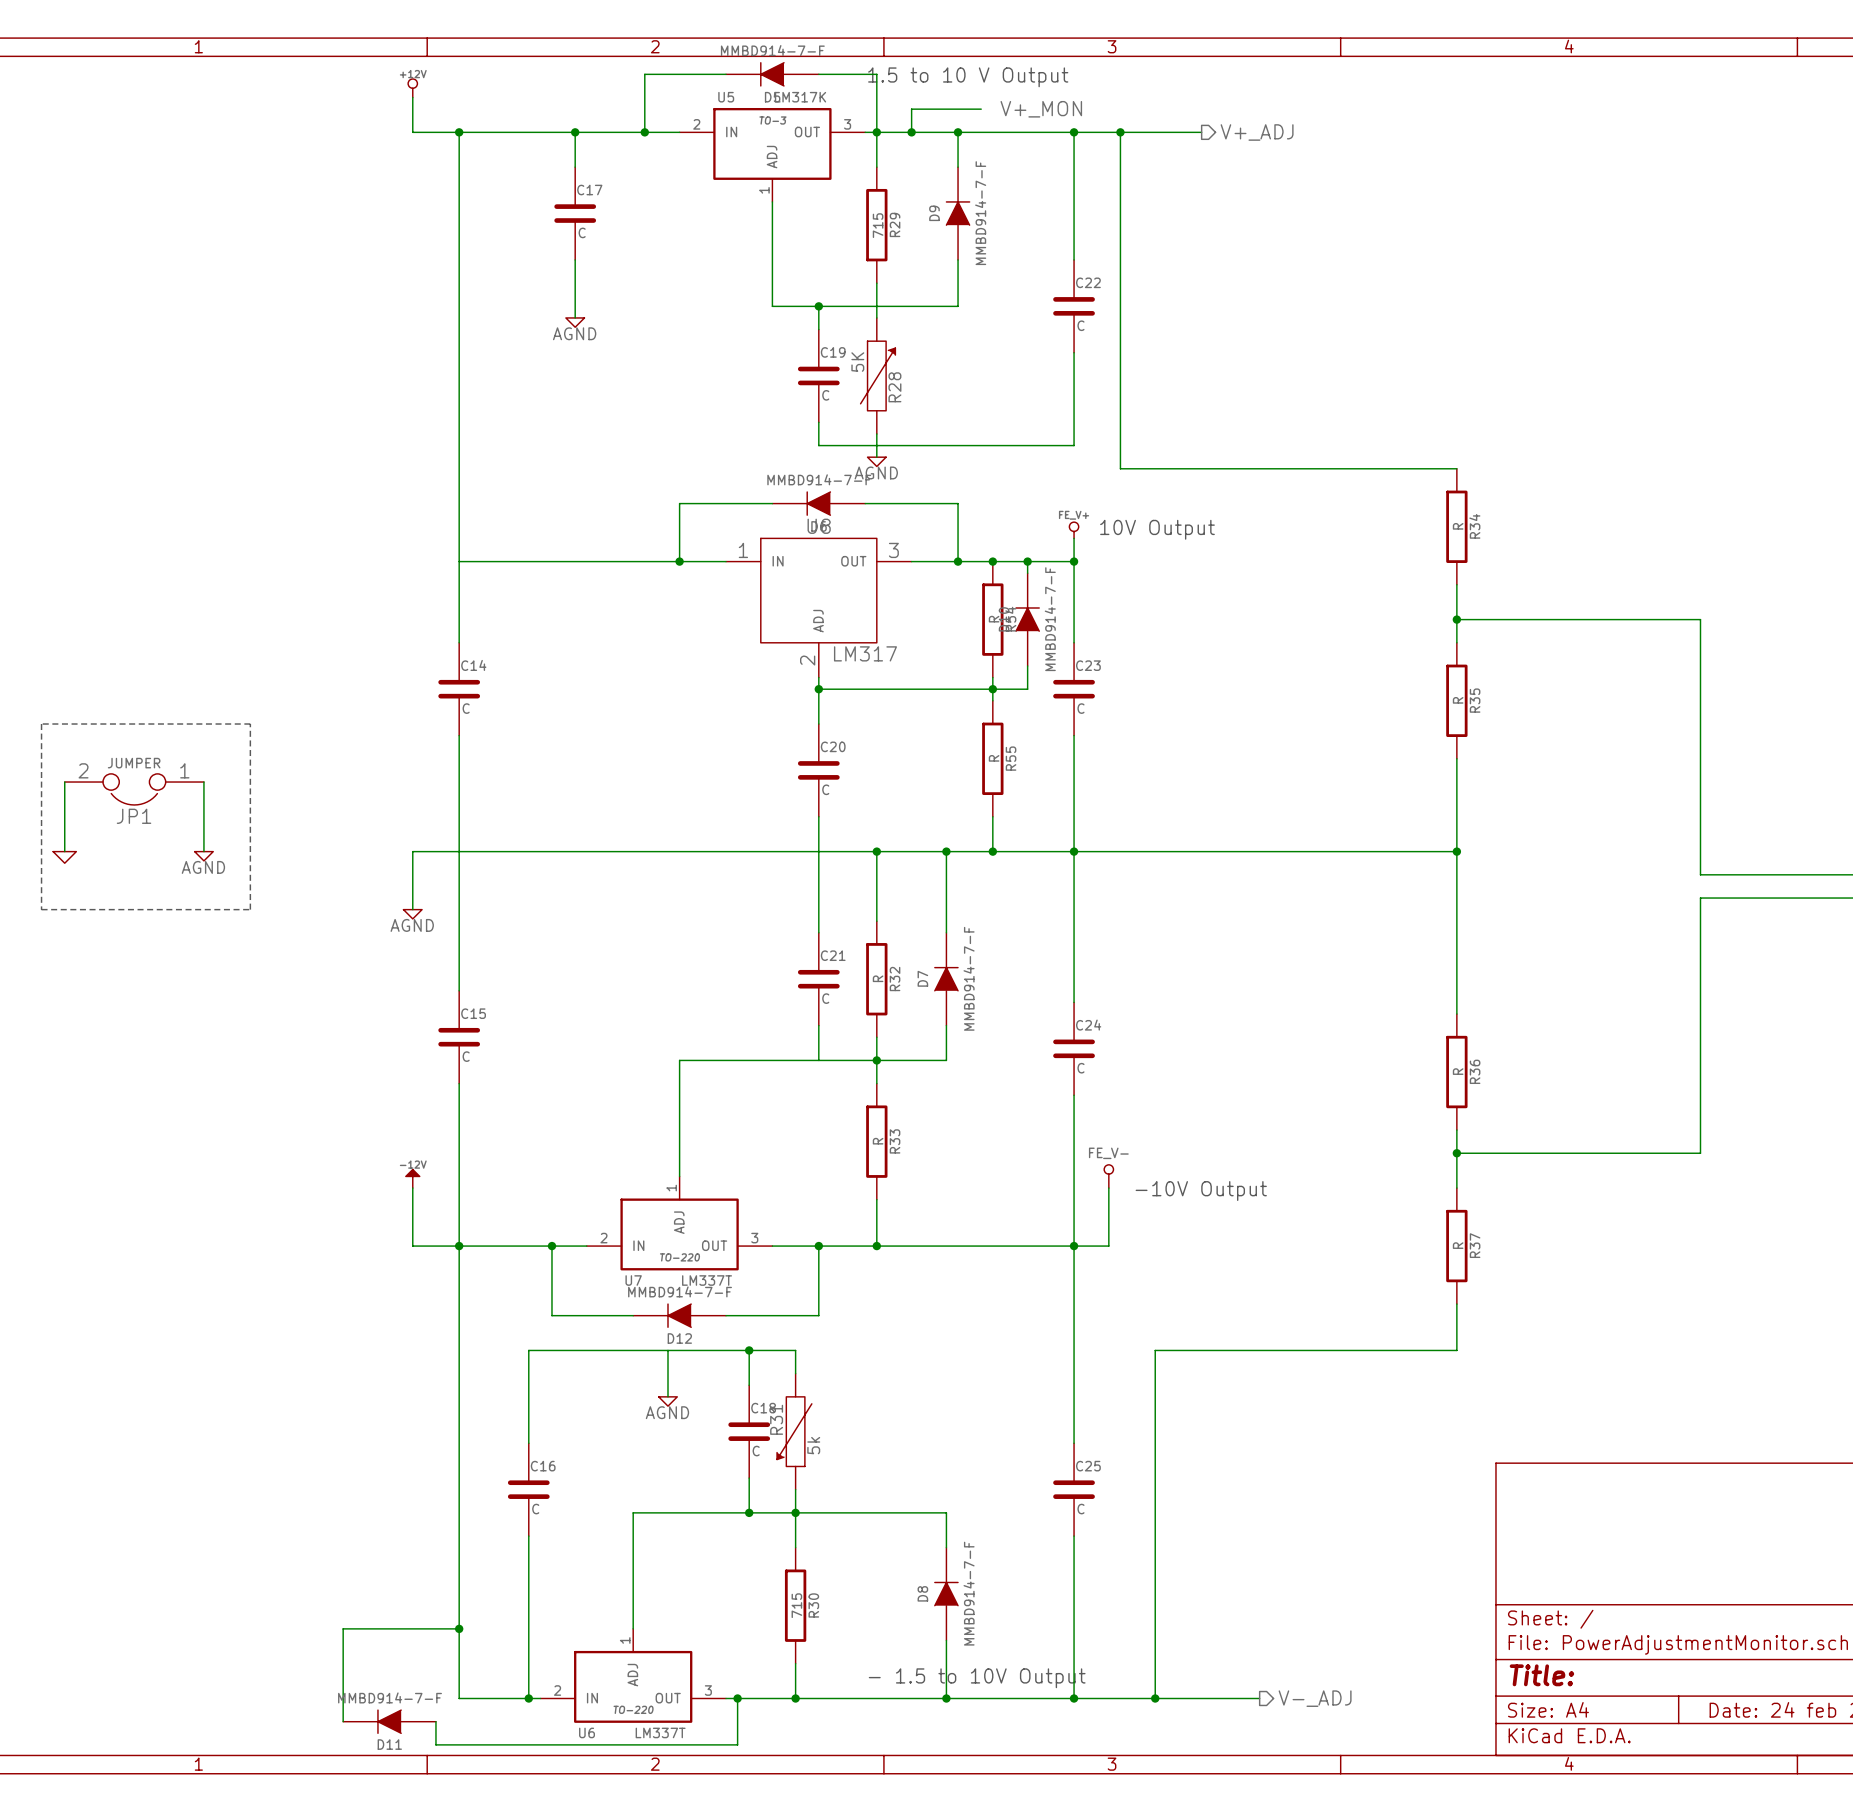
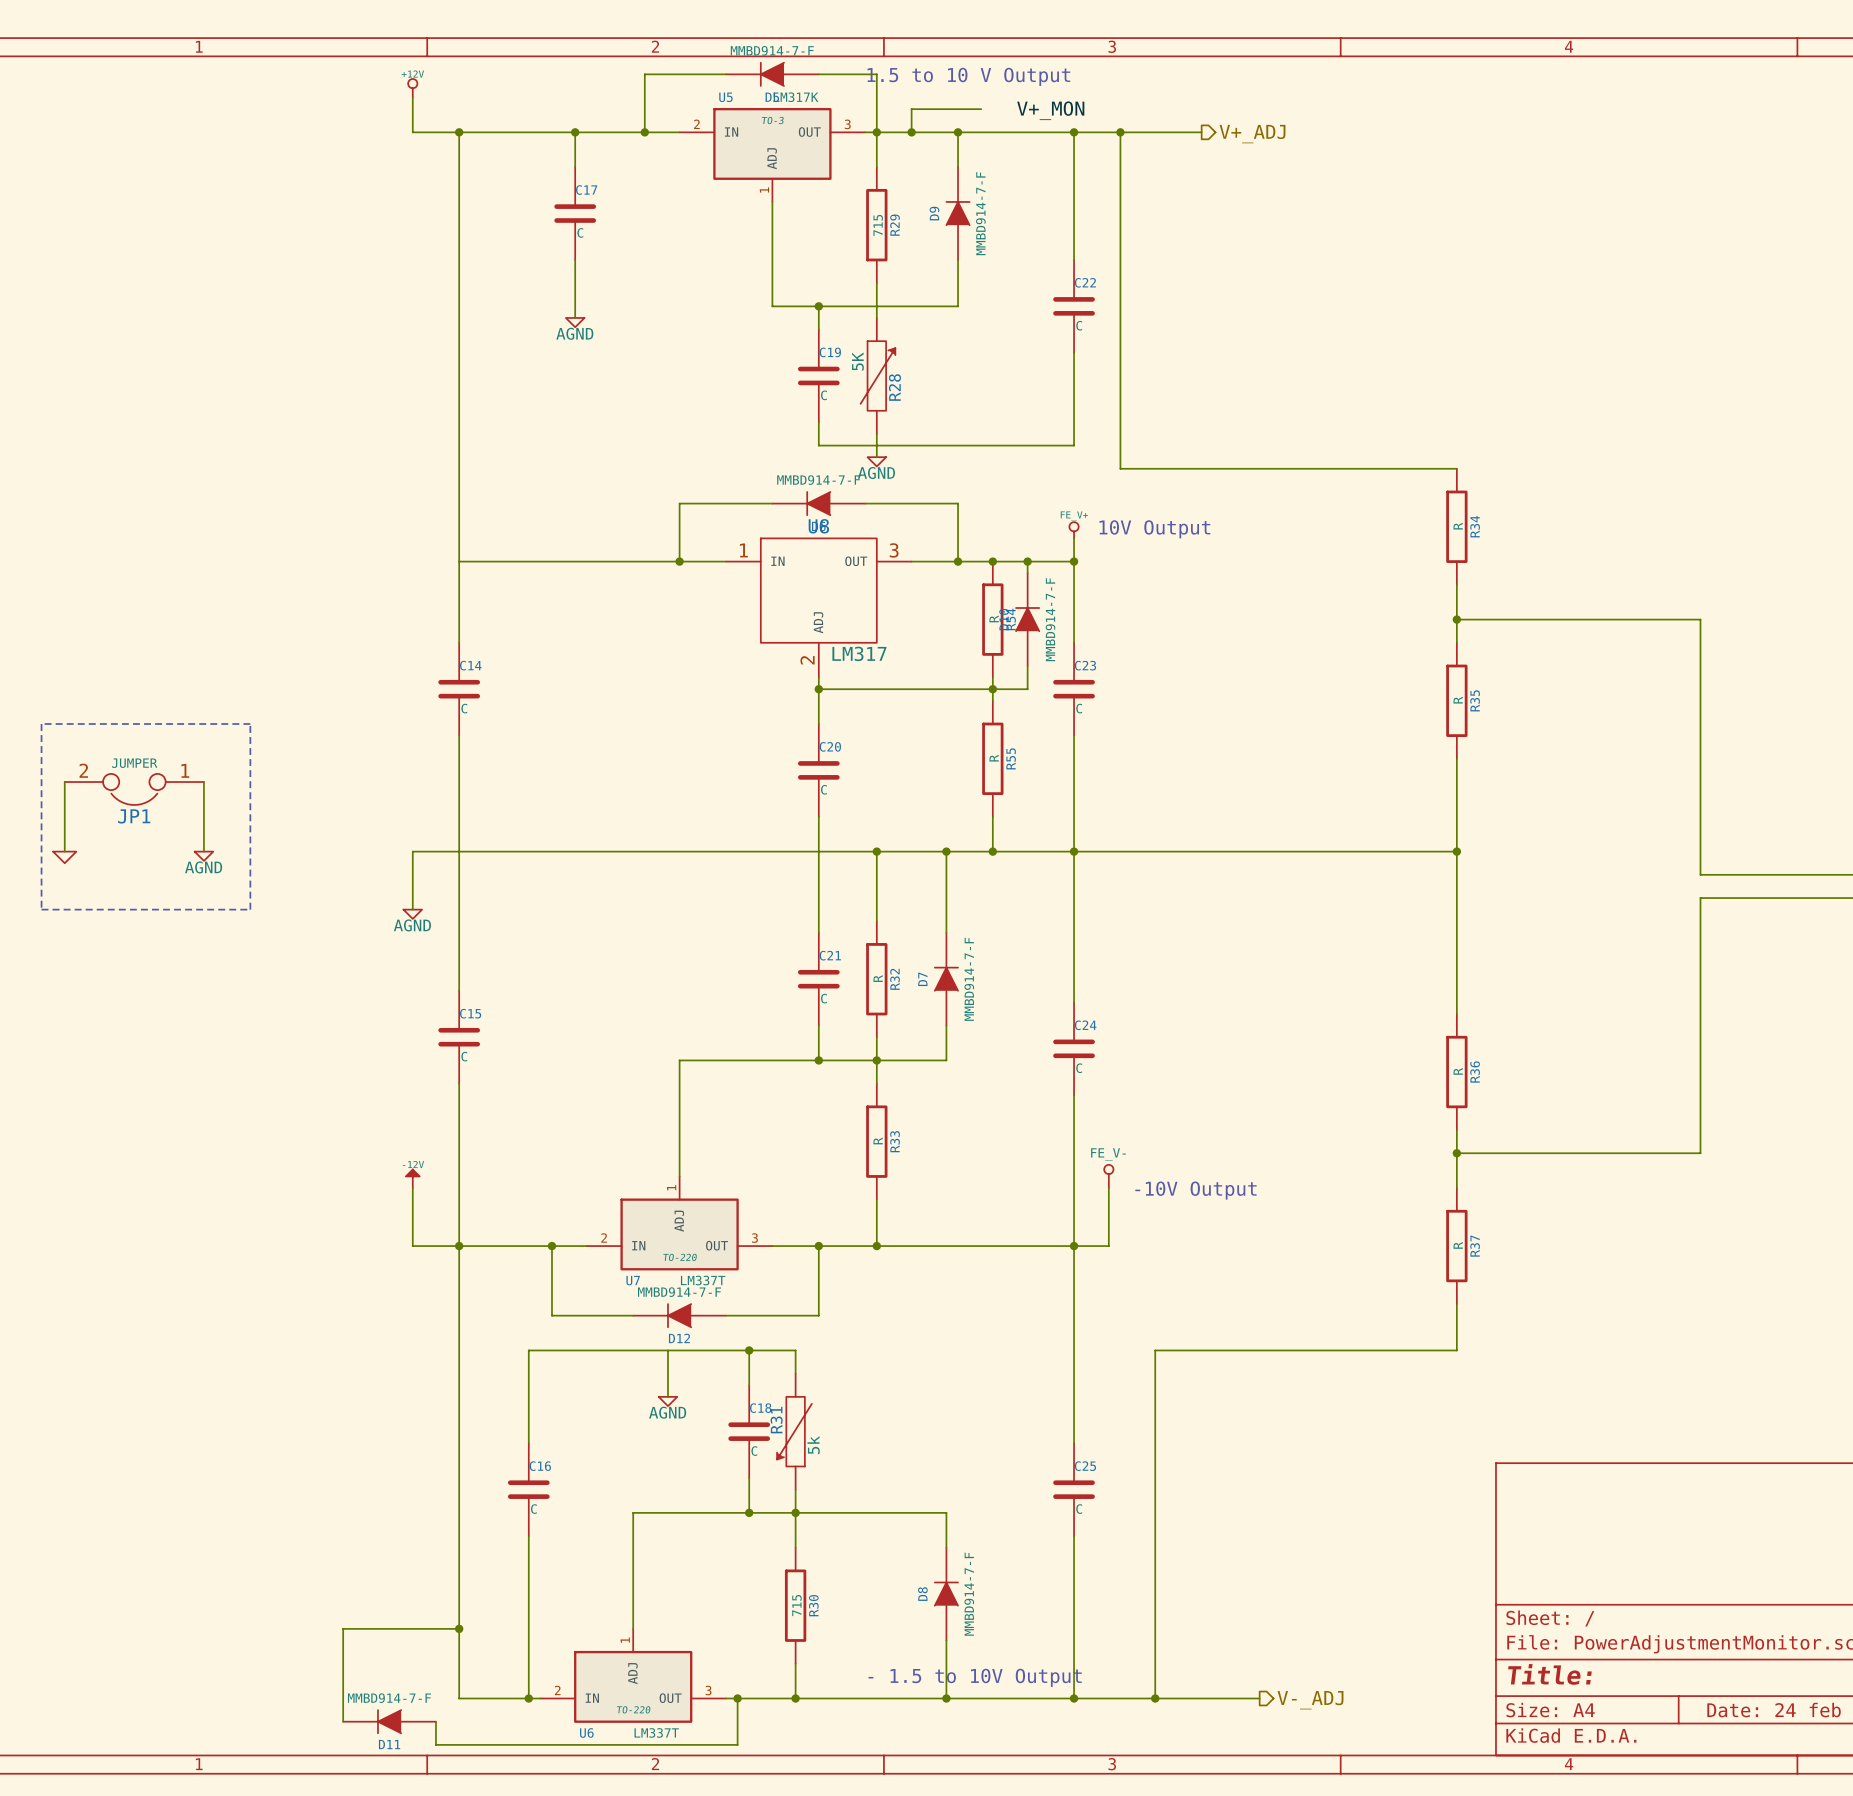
junction: none -> (818, 1060)

